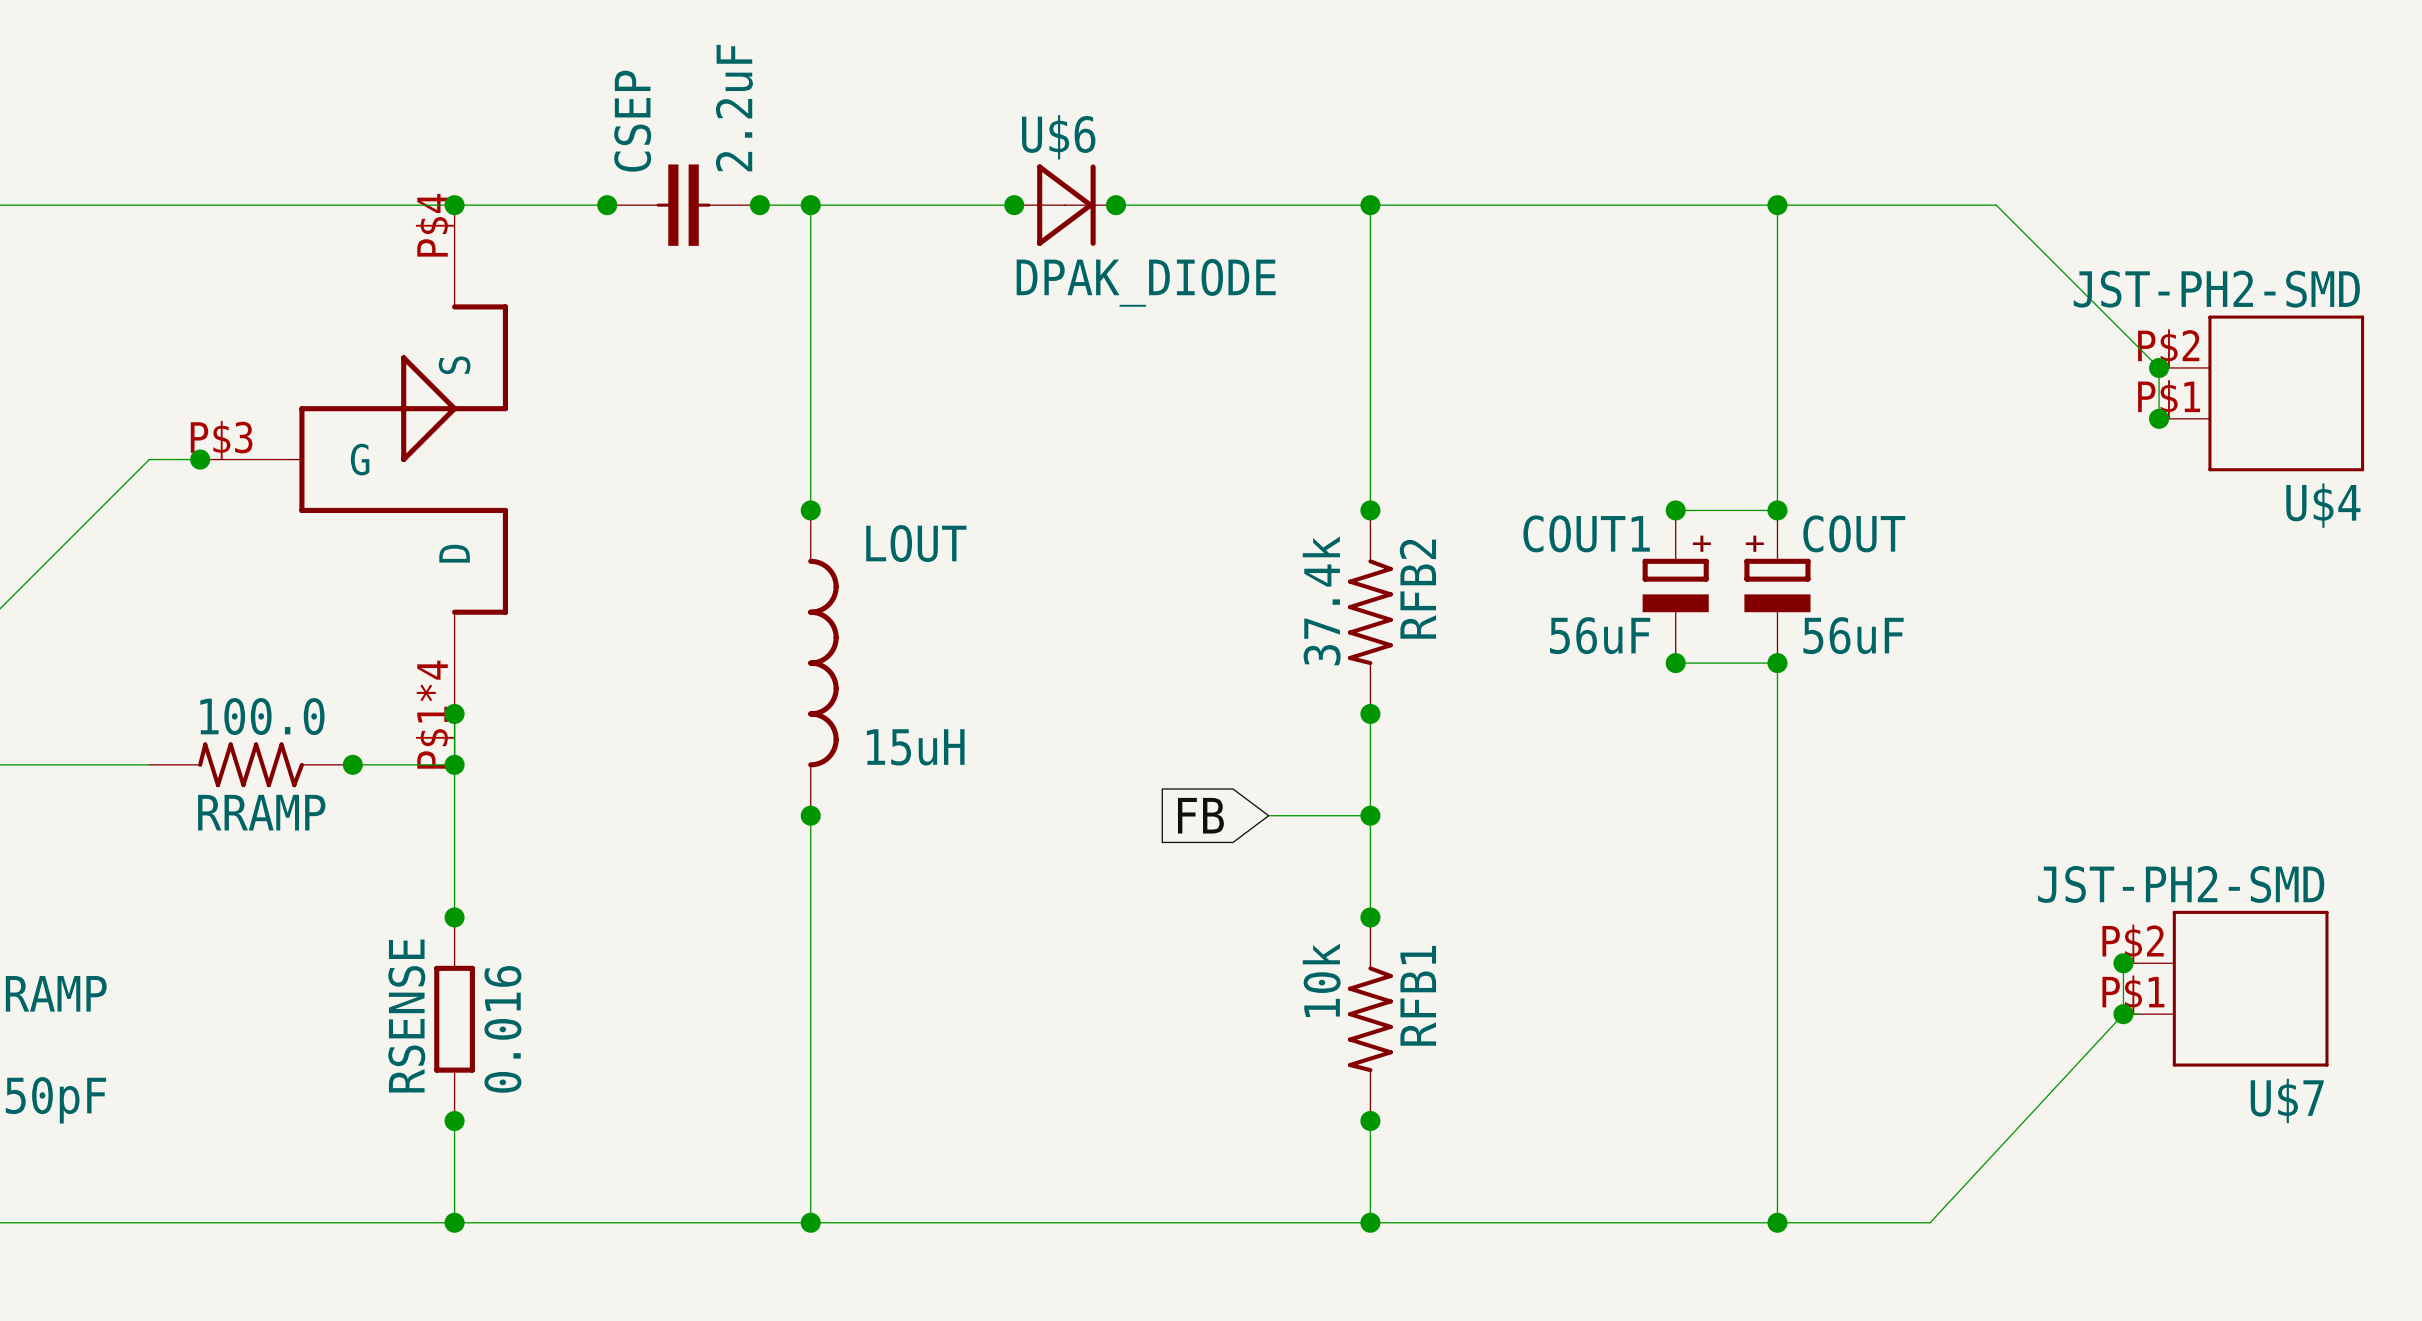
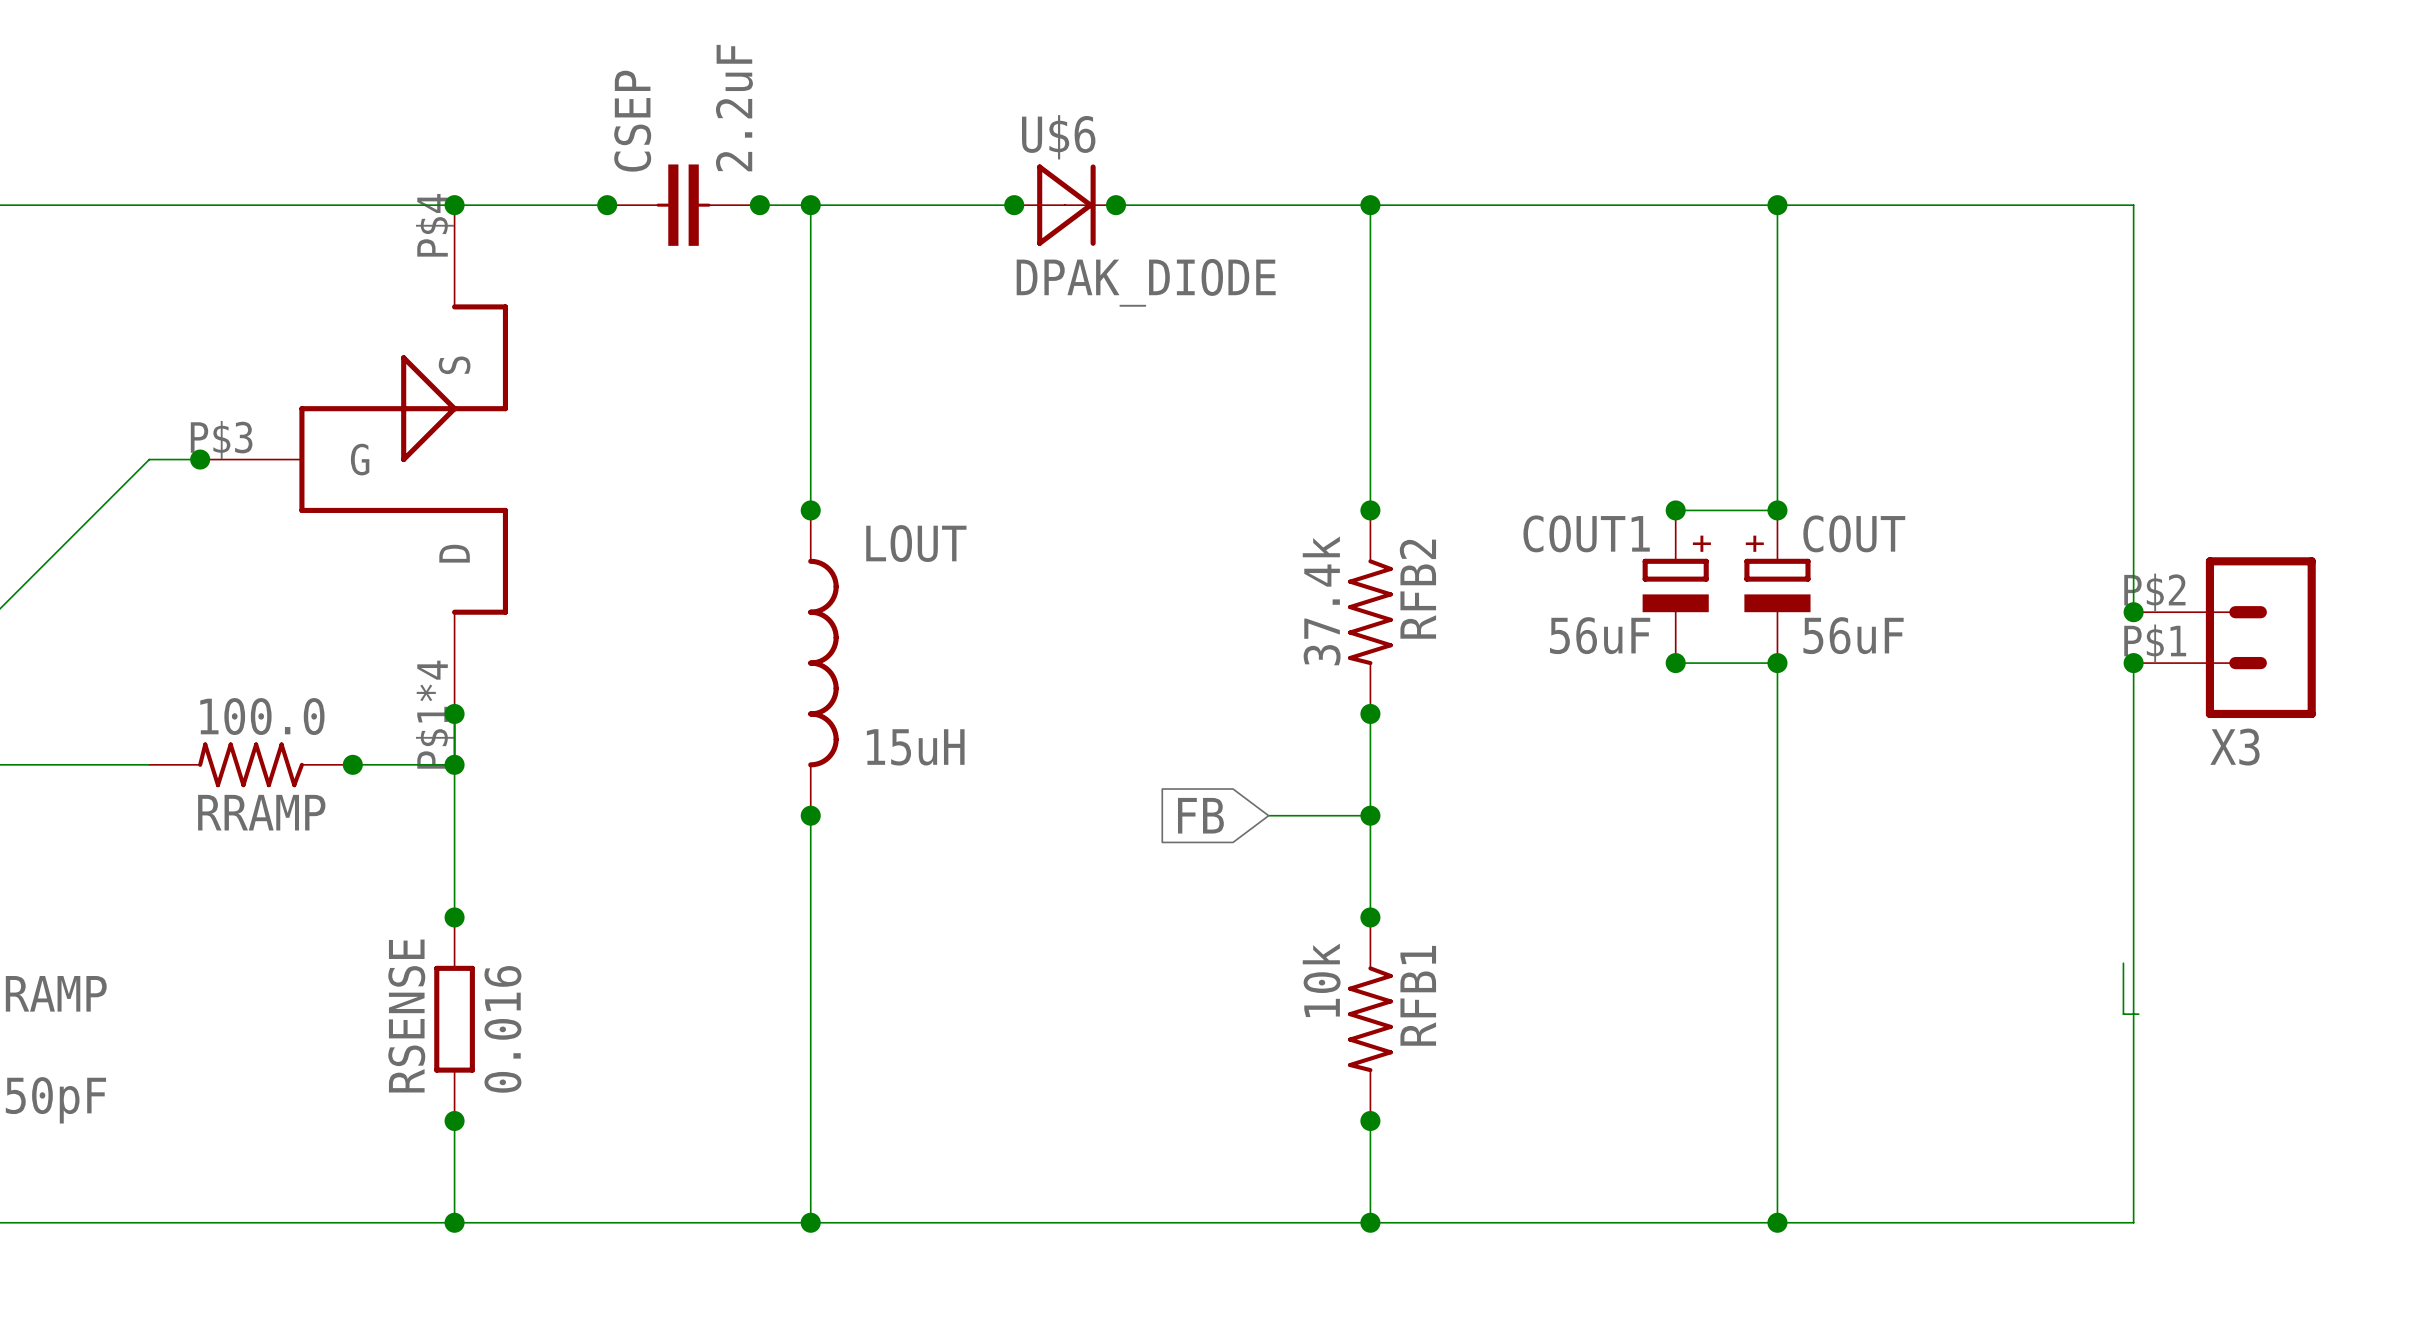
wire: (1996, 205) (2159, 367) (2159, 418) -> (1996, 205) (2133, 205) (2133, 612)
junction: (2159, 367) -> none
U$4: JST-PH2-SMD (2261, 393) -> none
junction: (2159, 418) -> none
junction: none -> (2133, 612)
X3: none -> (2224, 637)
junction: none -> (2133, 663)
junction: (2123, 963) -> none
U$7: JST-PH2-SMD (2225, 988) -> none
wire: (2123, 1014) (1930, 1222) -> (2133, 663) (2133, 1222) (1930, 1222)
junction: (2123, 1014) -> none

